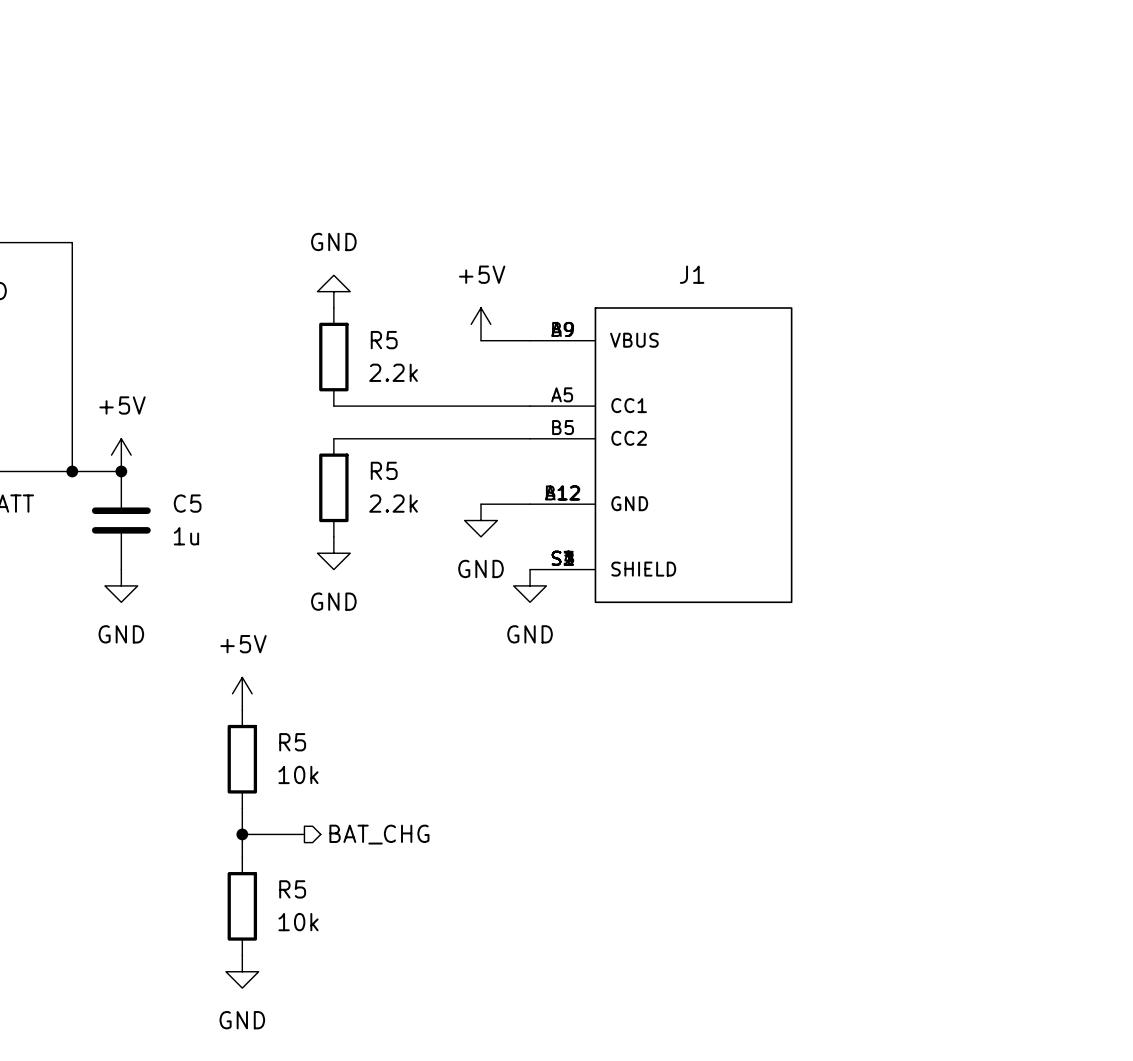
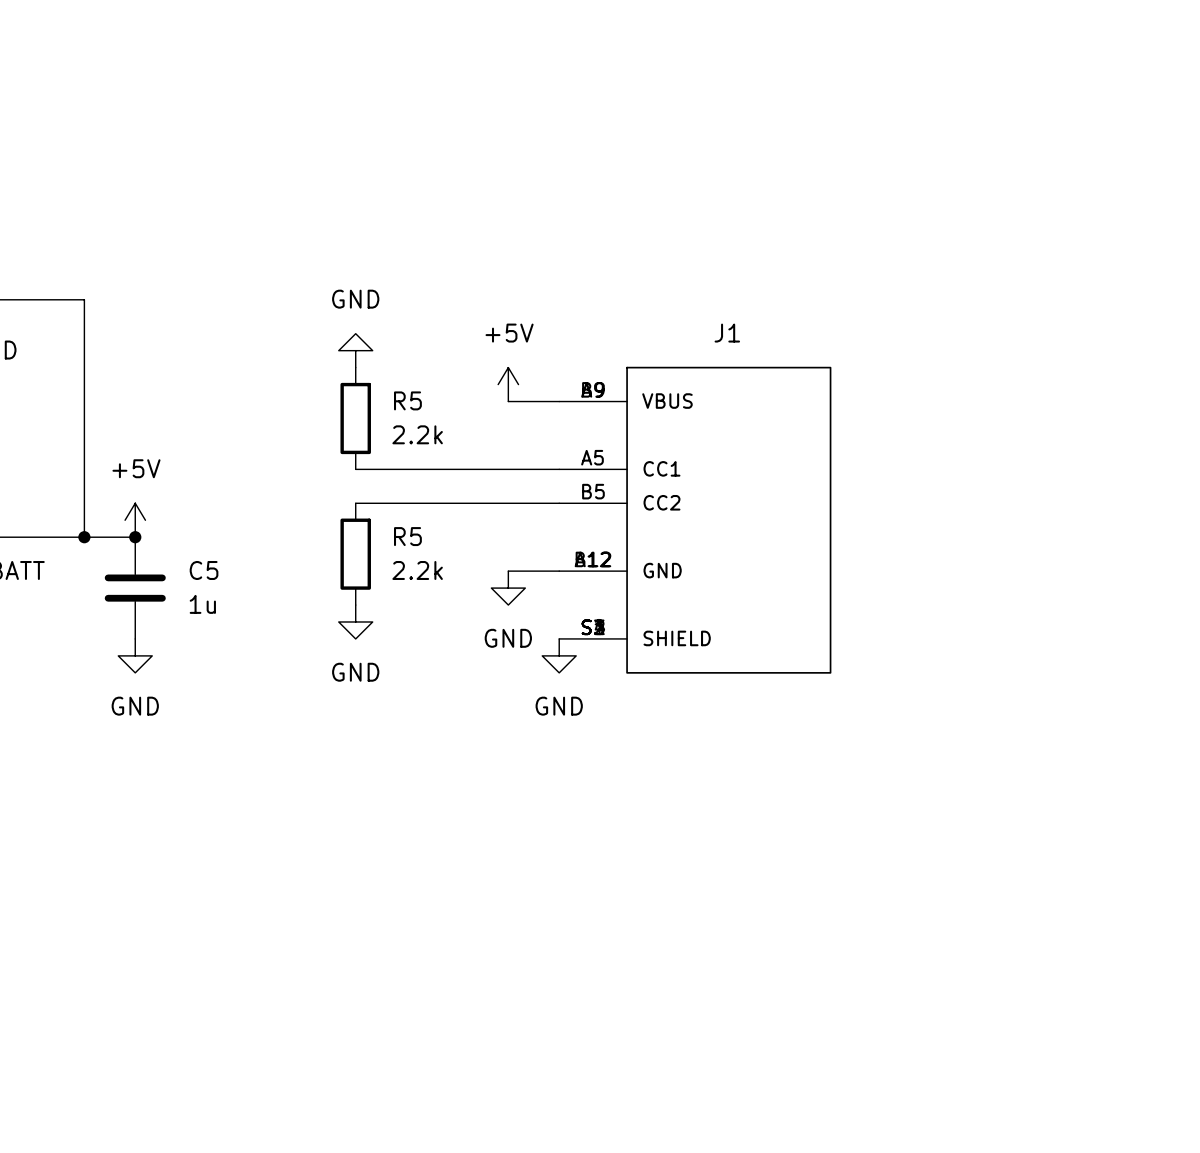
power symbol: +5V (242, 693) -> none
R5: 10k (242, 759) -> none
wire: (242, 808) (242, 857) -> none
wire: (242, 834) (304, 834) -> none
junction: (242, 834) -> none
hierarchical label: BAT_CHG (379, 834) -> none
R5: 10k (242, 906) -> none
power symbol: GND (242, 971) -> none

